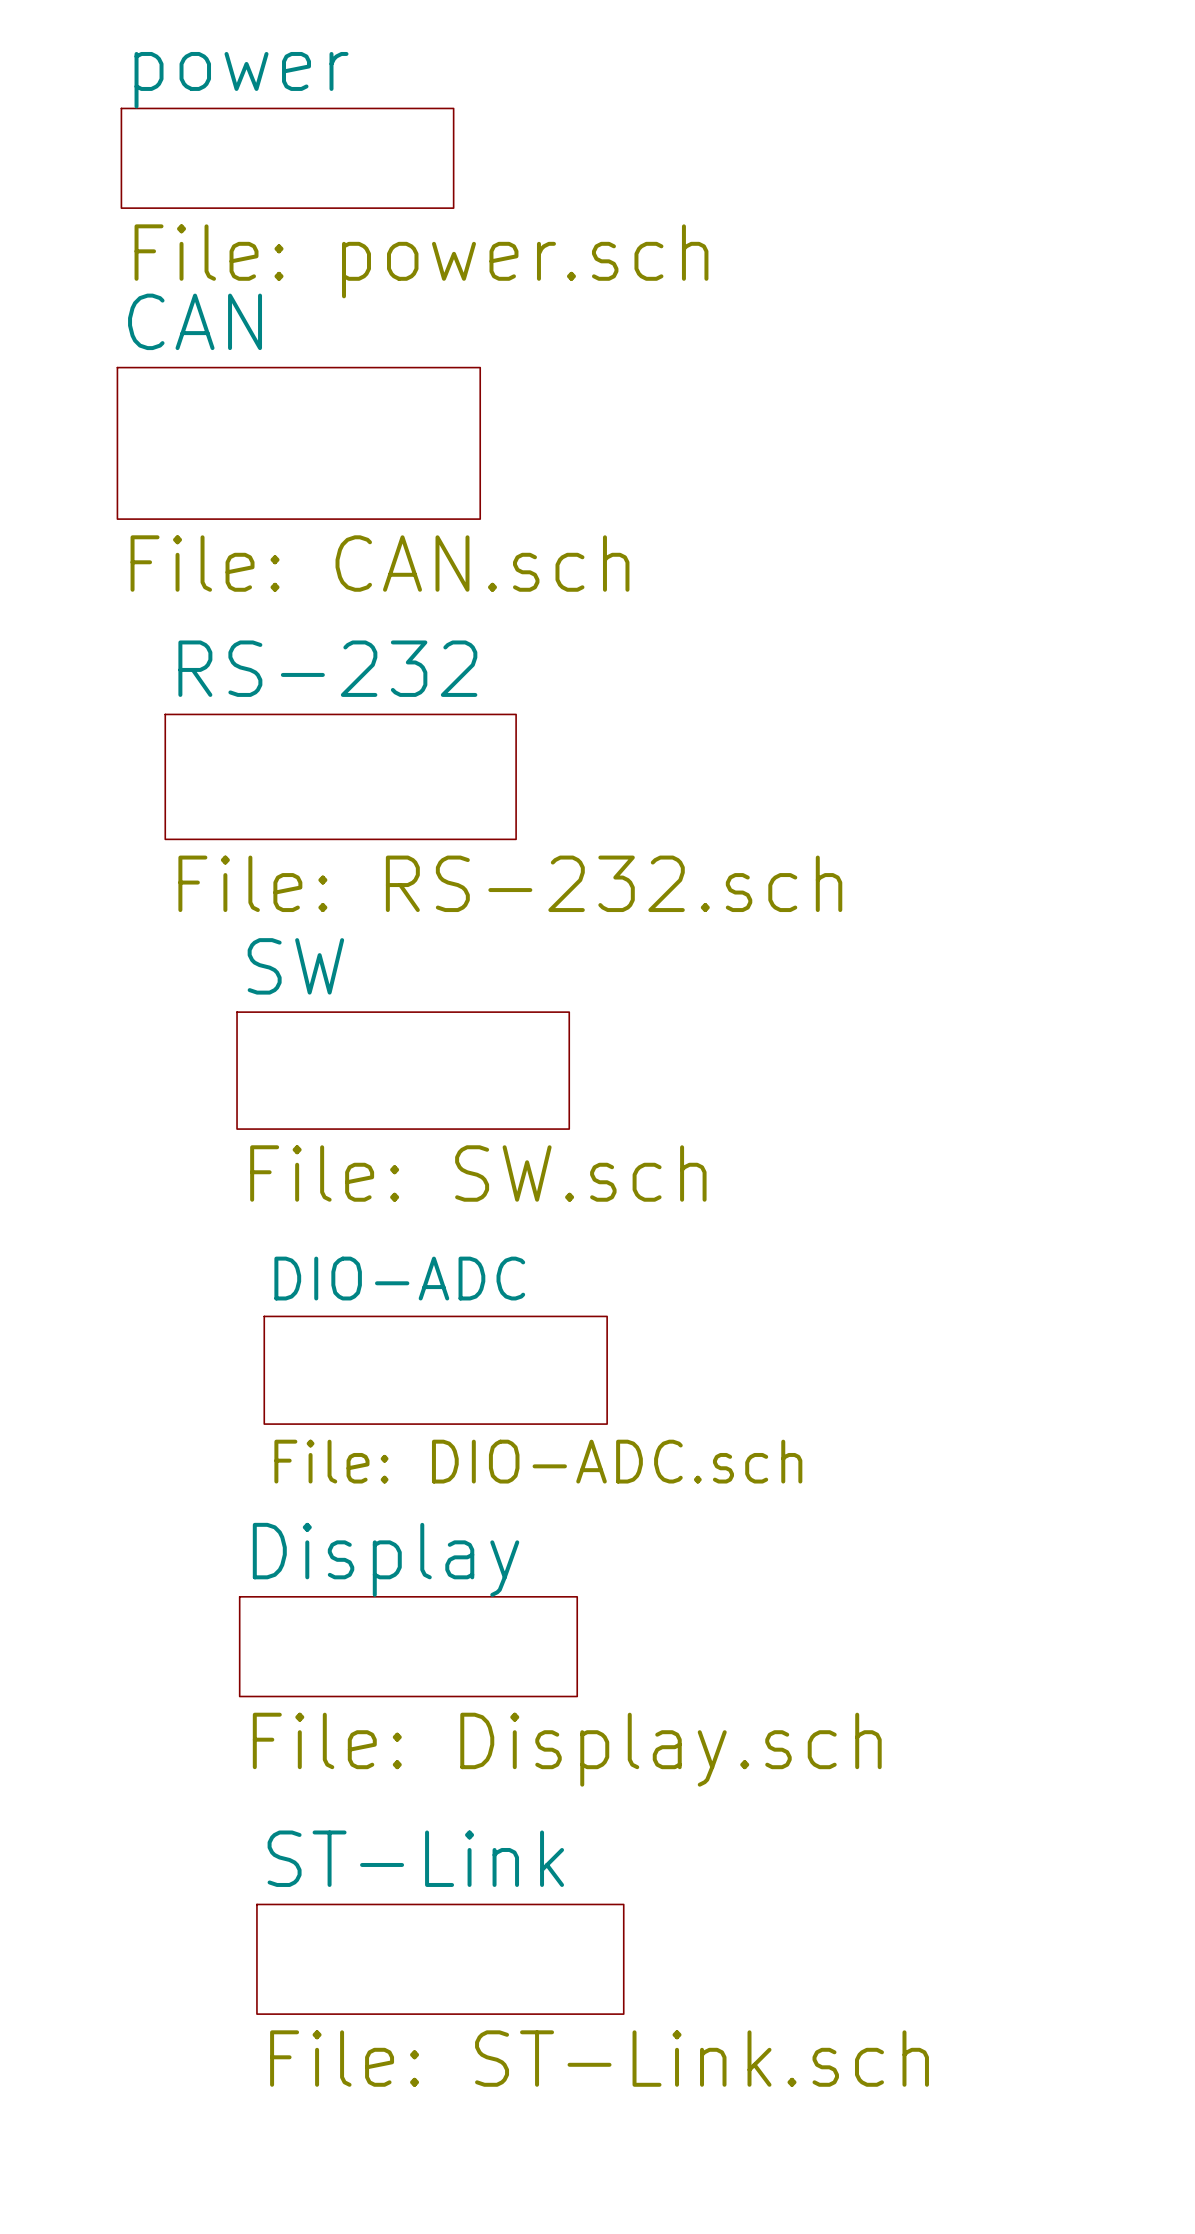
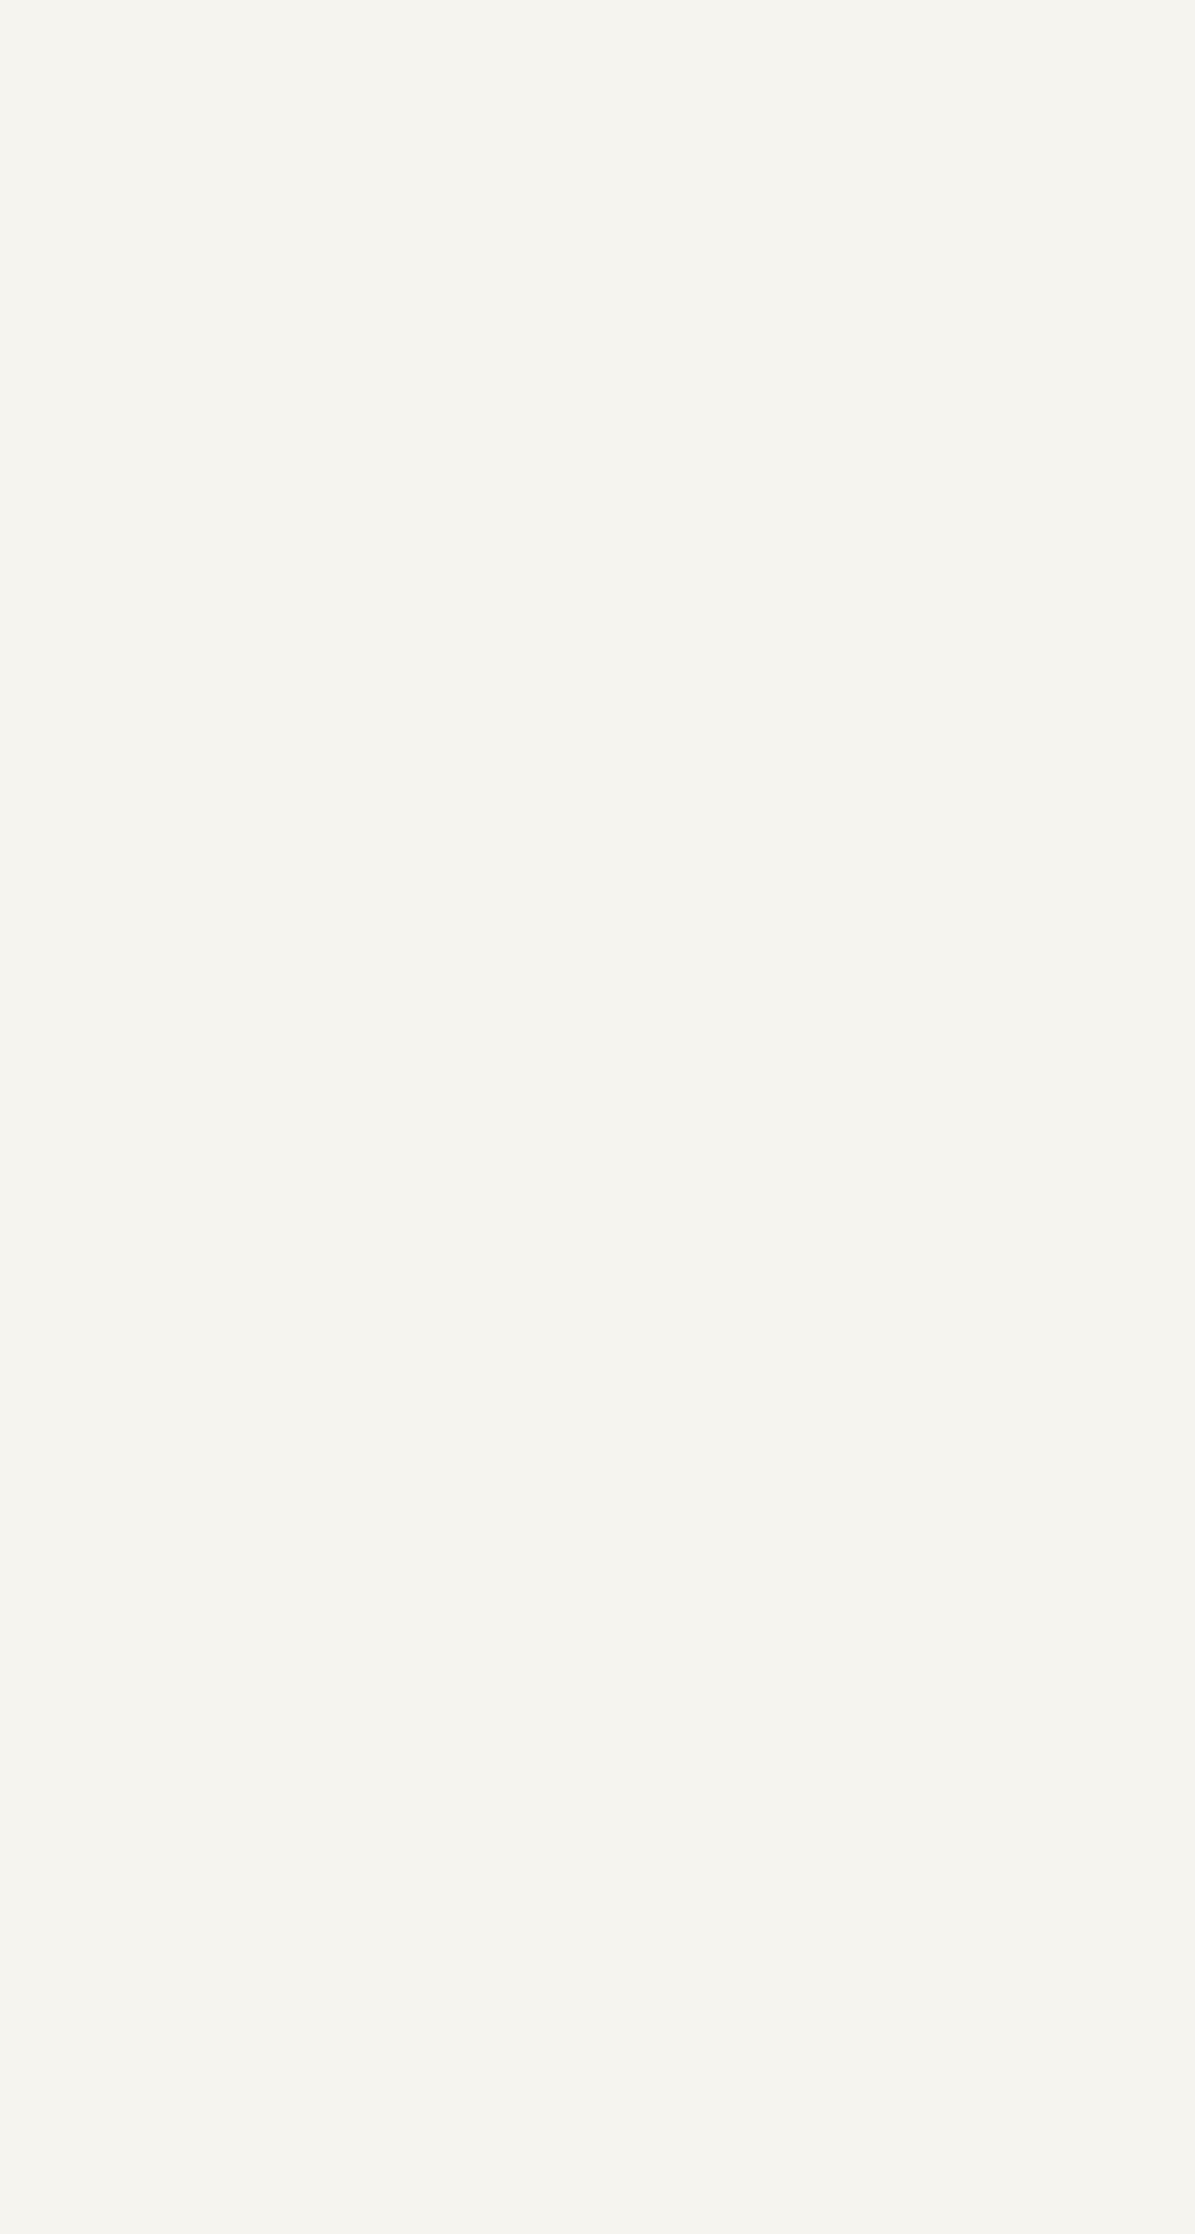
sheet power: File: power.sch (287, 158) -> none
sheet CAN: File: CAN.sch (298, 443) -> none
sheet RS-232: File: RS-232.sch (340, 776) -> none
sheet SW: File: SW.sch (403, 1070) -> none
sheet DIO-ADC: File: DIO-ADC.sch (435, 1370) -> none
sheet Display: File: Display.sch (408, 1646) -> none
sheet ST-Link: File: ST-Link.sch (440, 1959) -> none

